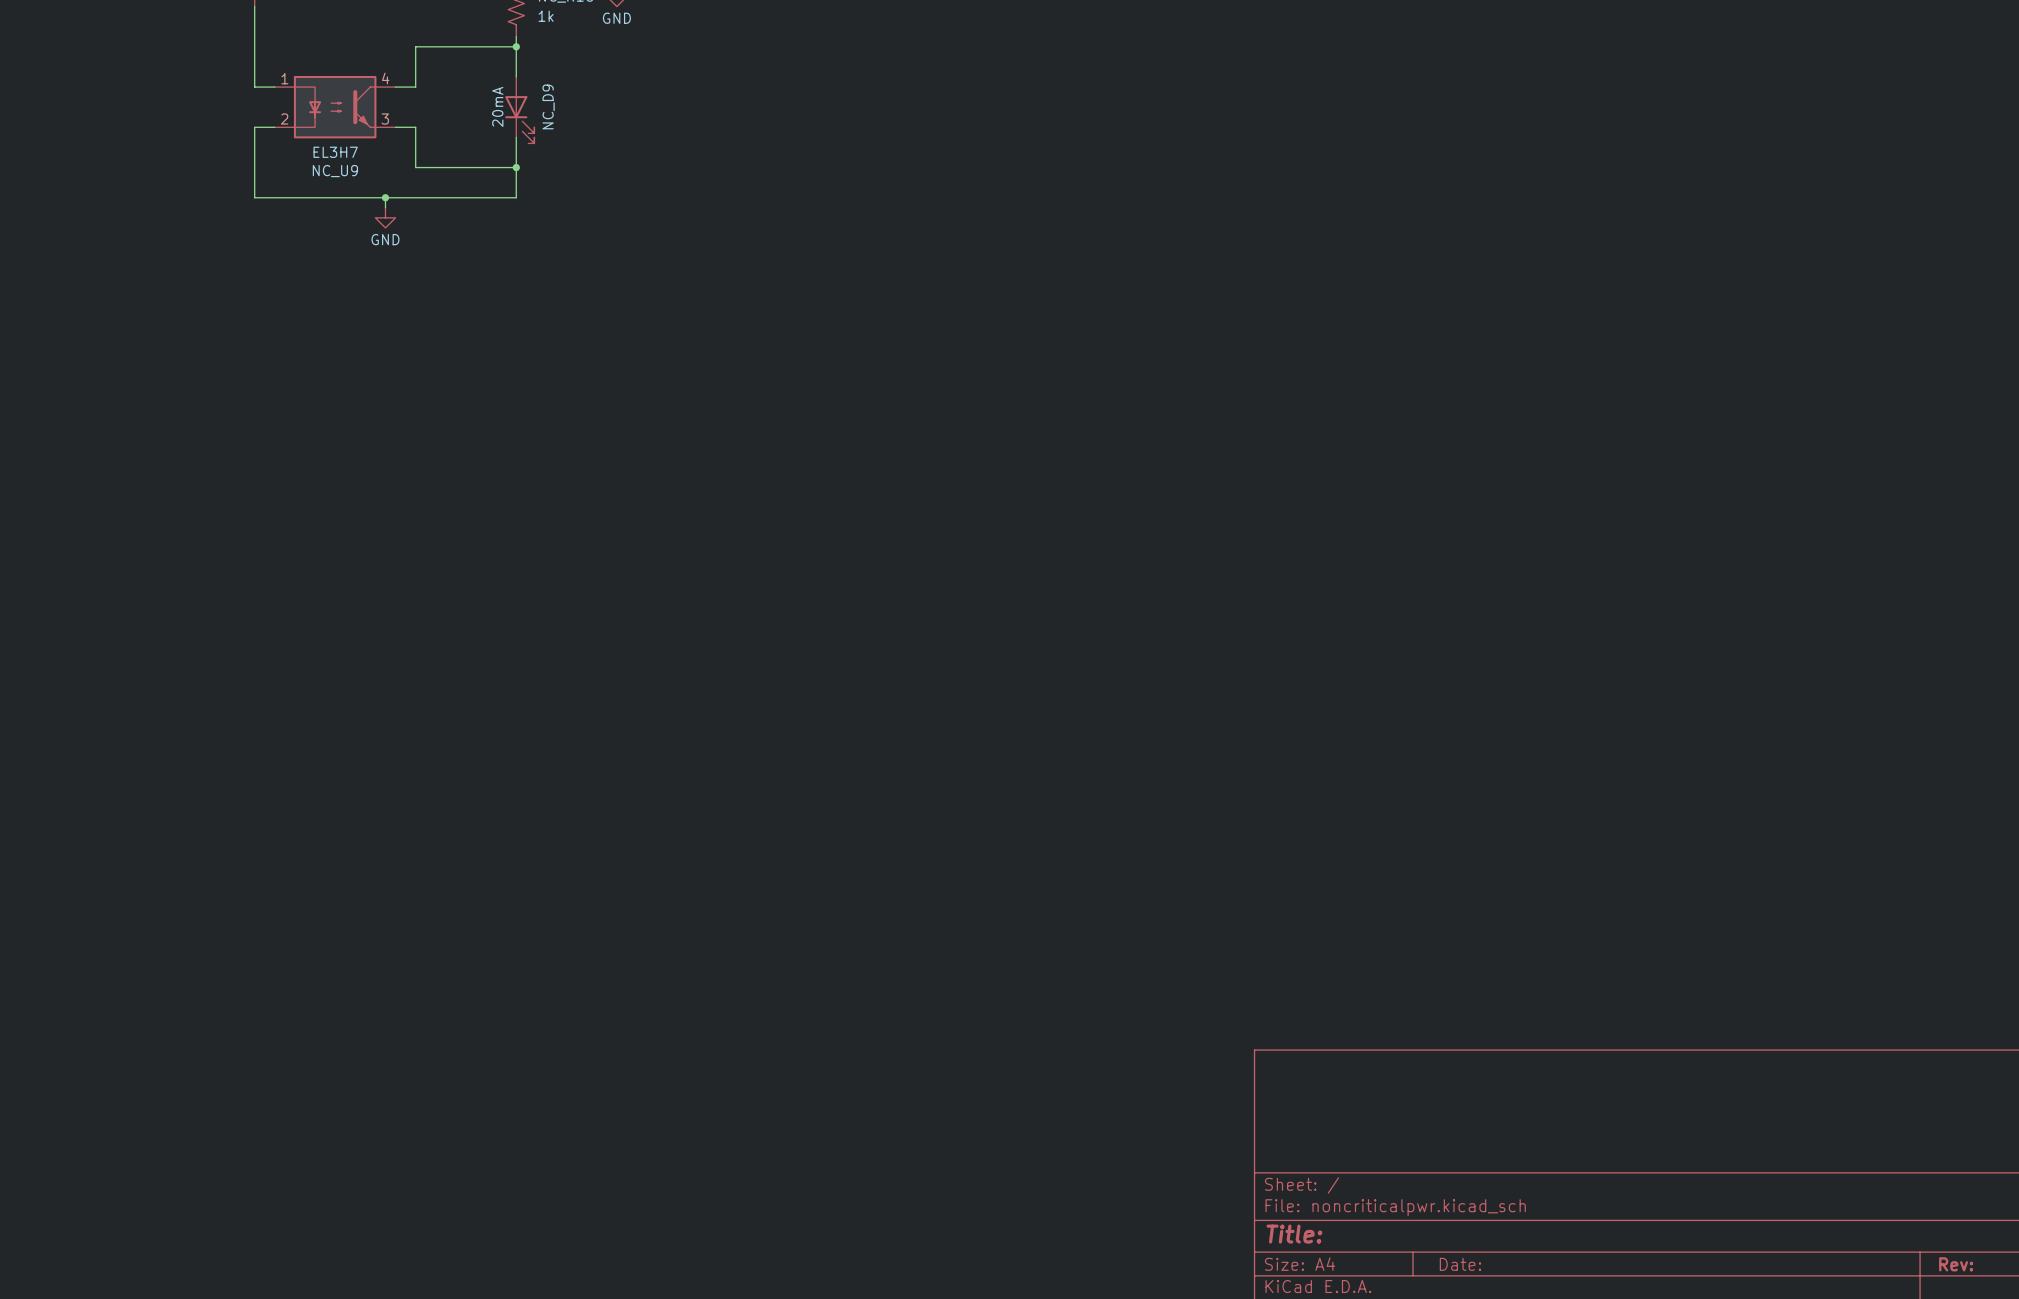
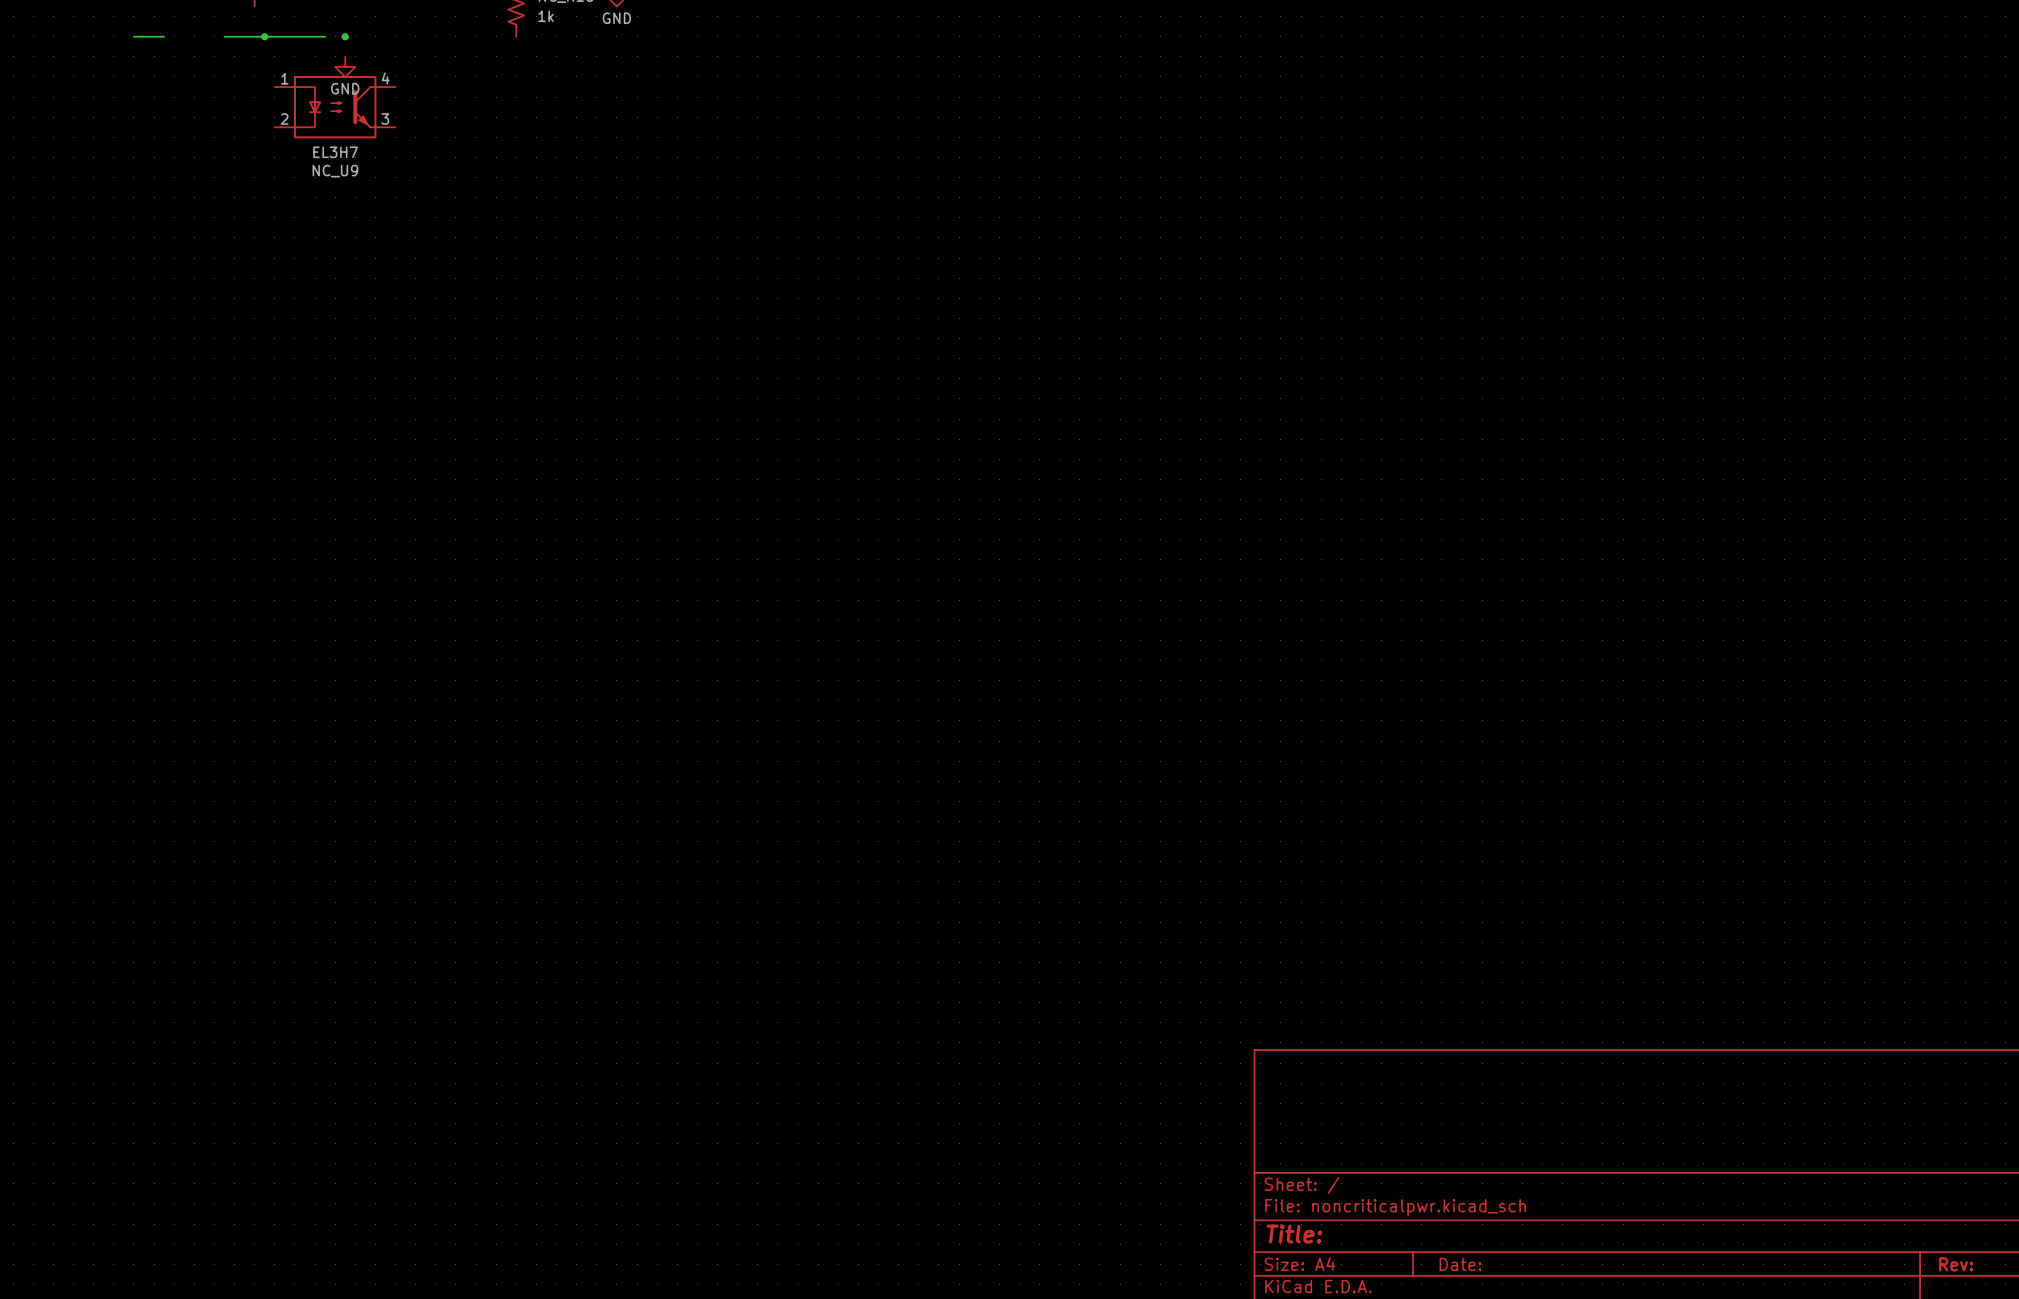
wire: (254, 6) (254, 87) (274, 87) -> none
wire: none -> (133, 36) (164, 36)
wire: none -> (224, 36) (325, 36)
junction: none -> (264, 36)
junction: none -> (345, 36)
wire: (516, 36) (516, 76) -> none
wire: (516, 46) (415, 46) (415, 87) (395, 87) -> none
junction: (516, 46) -> none
NC_D9: 20mA (519, 110) -> none
wire: (274, 127) (254, 127) (254, 197) (516, 197) (516, 137) -> none
wire: (395, 127) (415, 127) (415, 167) (516, 167) -> none
junction: (516, 167) -> none
wire: (385, 197) (385, 207) -> none
junction: (385, 197) -> none
power symbol position: GND (385, 217) -> GND (345, 66)

